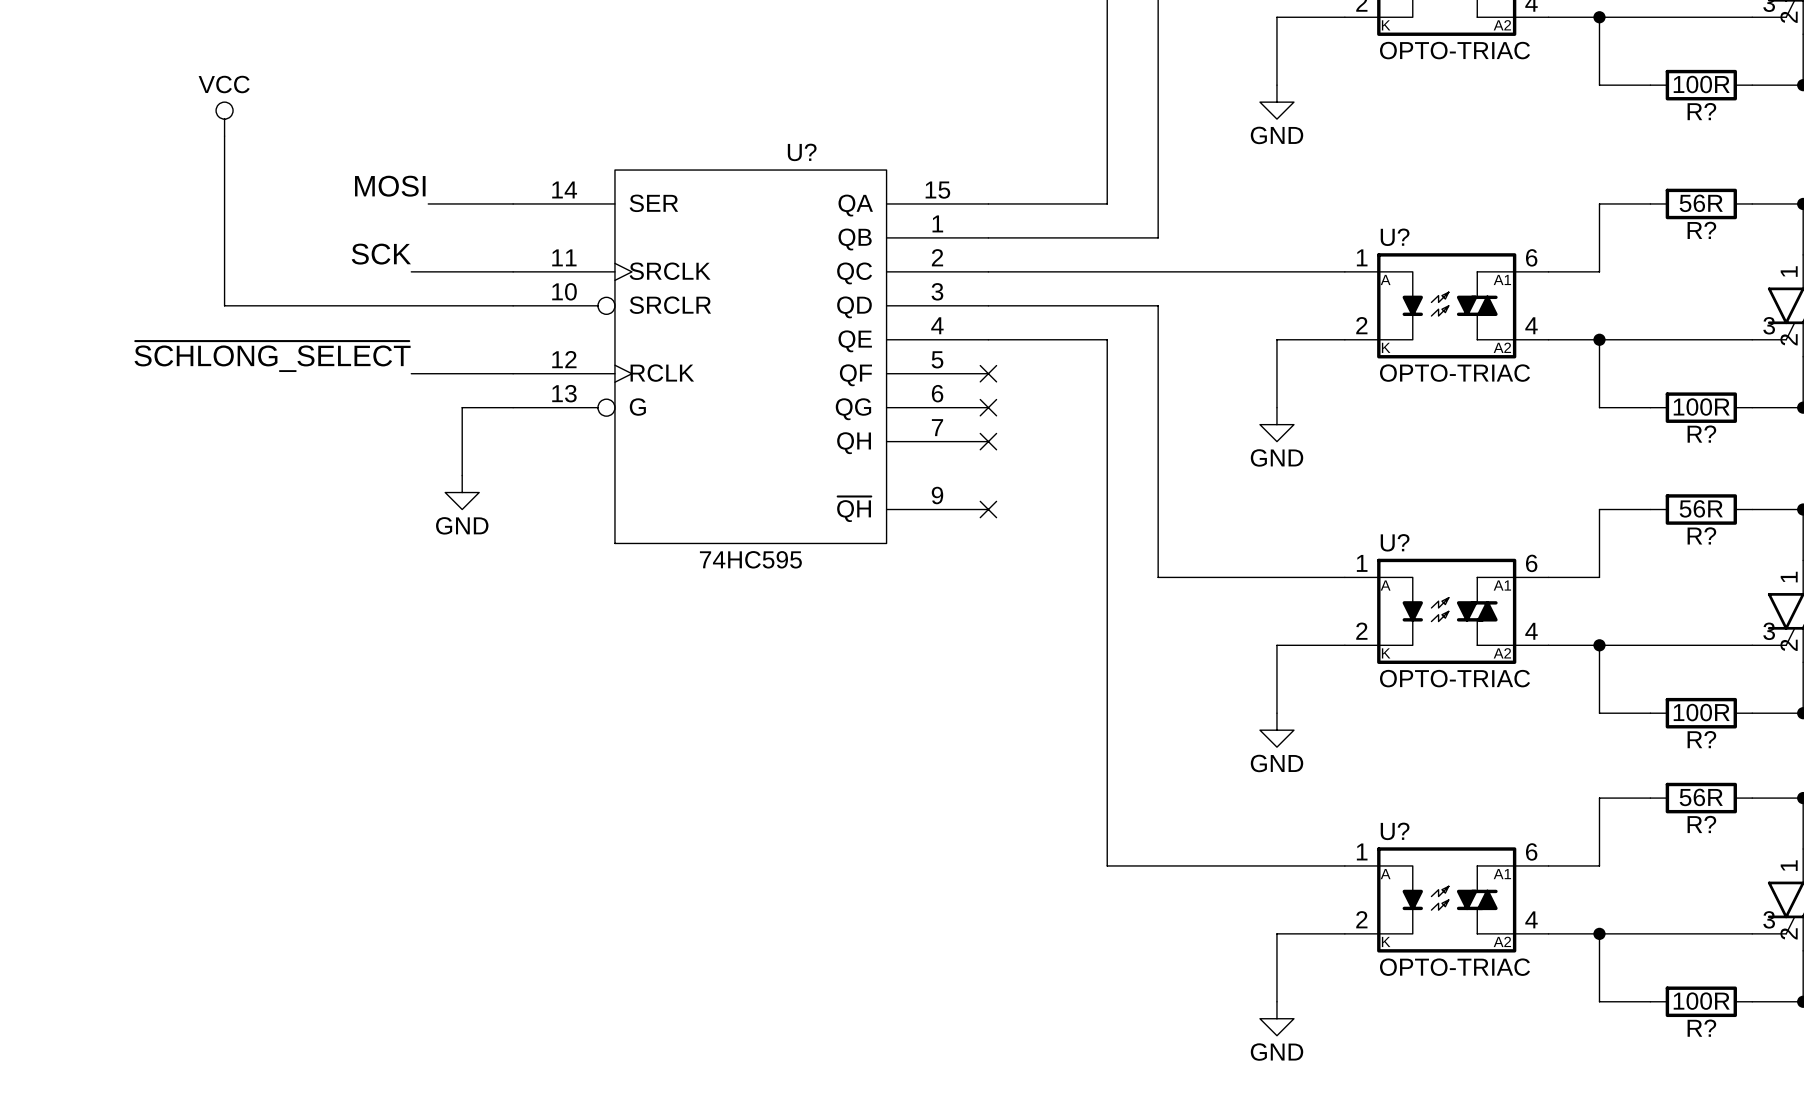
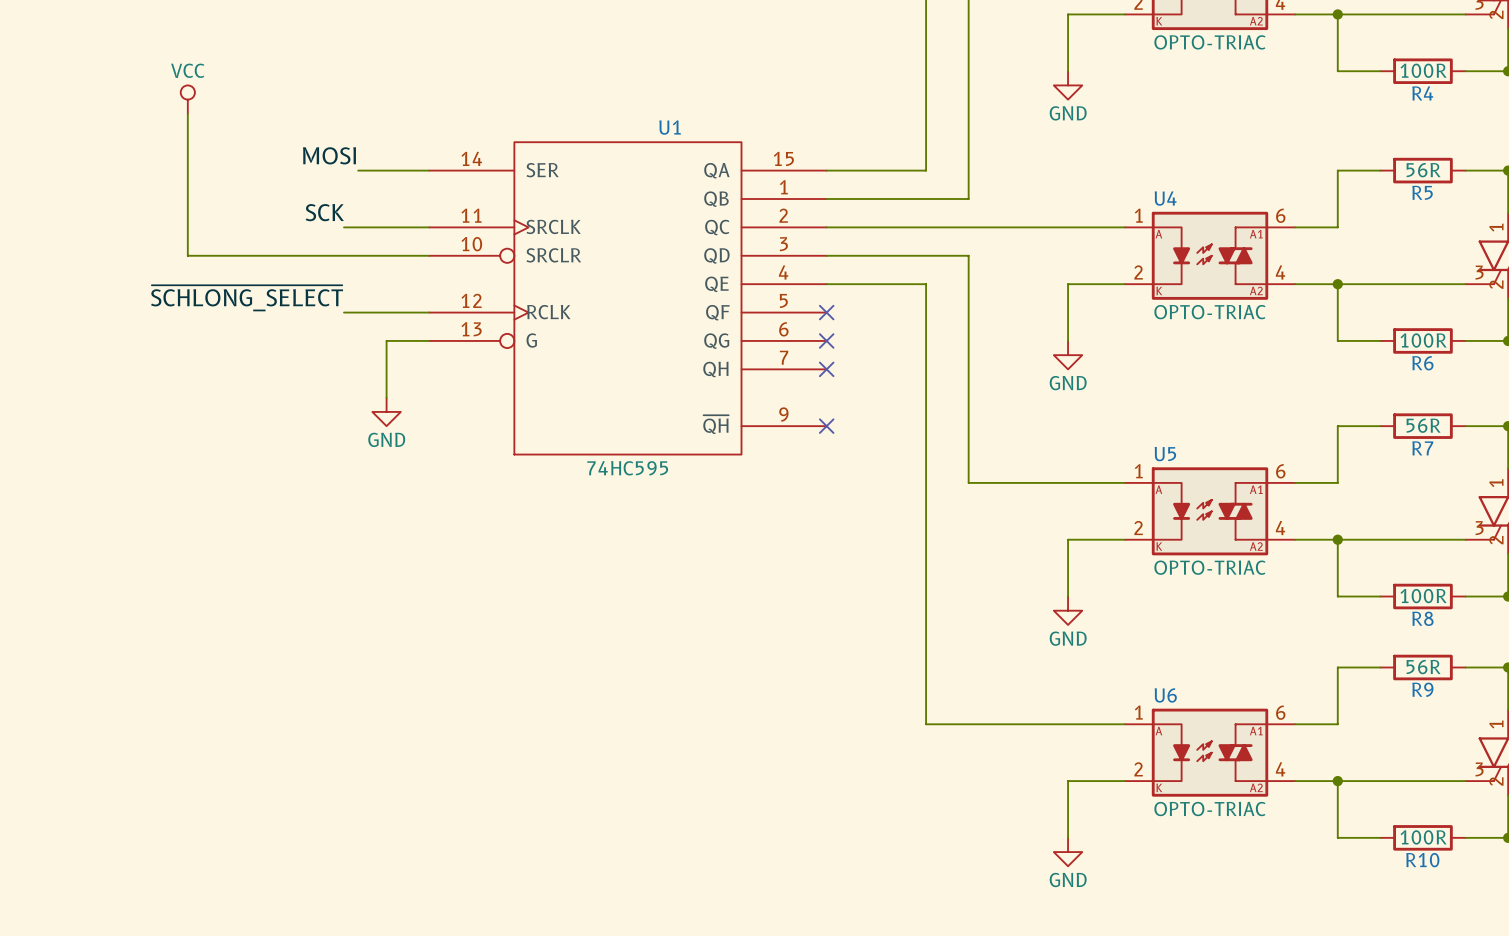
R? name: R? (1701, 111) -> R4 (1422, 93)
U? name: U? (802, 152) -> U1 (670, 127)
R? name: R? (1701, 230) -> R5 (1422, 192)
U? name: U? (1395, 237) -> U4 (1165, 198)
R? name: R? (1701, 434) -> R6 (1422, 363)
R? name: R? (1701, 535) -> R7 (1422, 448)
U? name: U? (1395, 542) -> U5 (1165, 454)
R? name: R? (1701, 739) -> R8 (1422, 618)
R? name: R? (1701, 824) -> R9 (1422, 689)
U? name: U? (1395, 831) -> U6 (1165, 695)
R? name: R? (1701, 1028) -> R10 (1422, 860)

